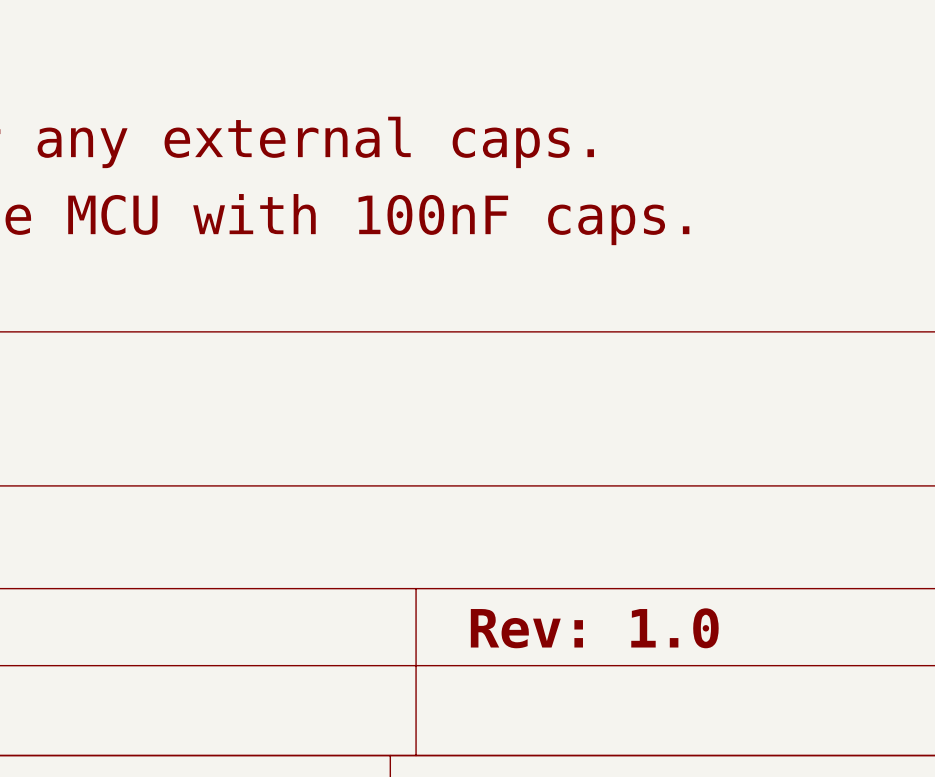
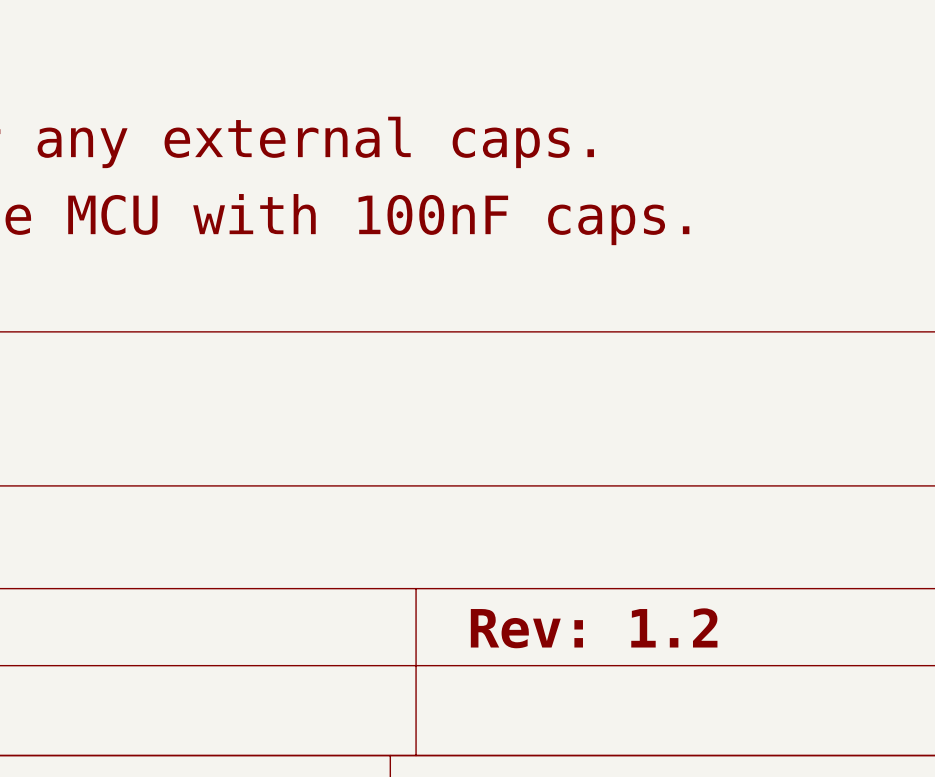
title block: Rev: 1.0 (594, 628) -> Rev: 1.2 (594, 628)

